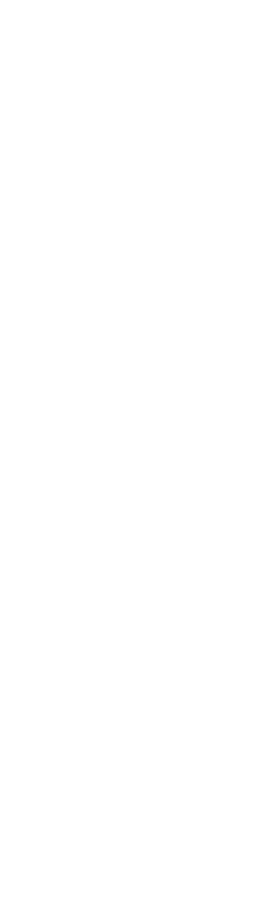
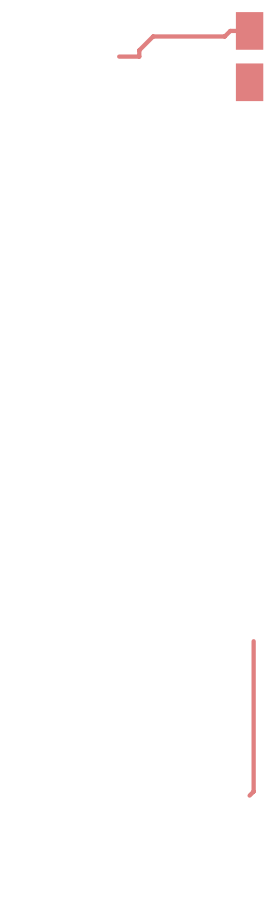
top track: none -> (249, 30) (230, 30) (224, 36) (153, 36) (139, 50) (139, 56) (119, 56)
part: none -> (249, 56)
top track: none -> (253, 641) (253, 791) (249, 795)

